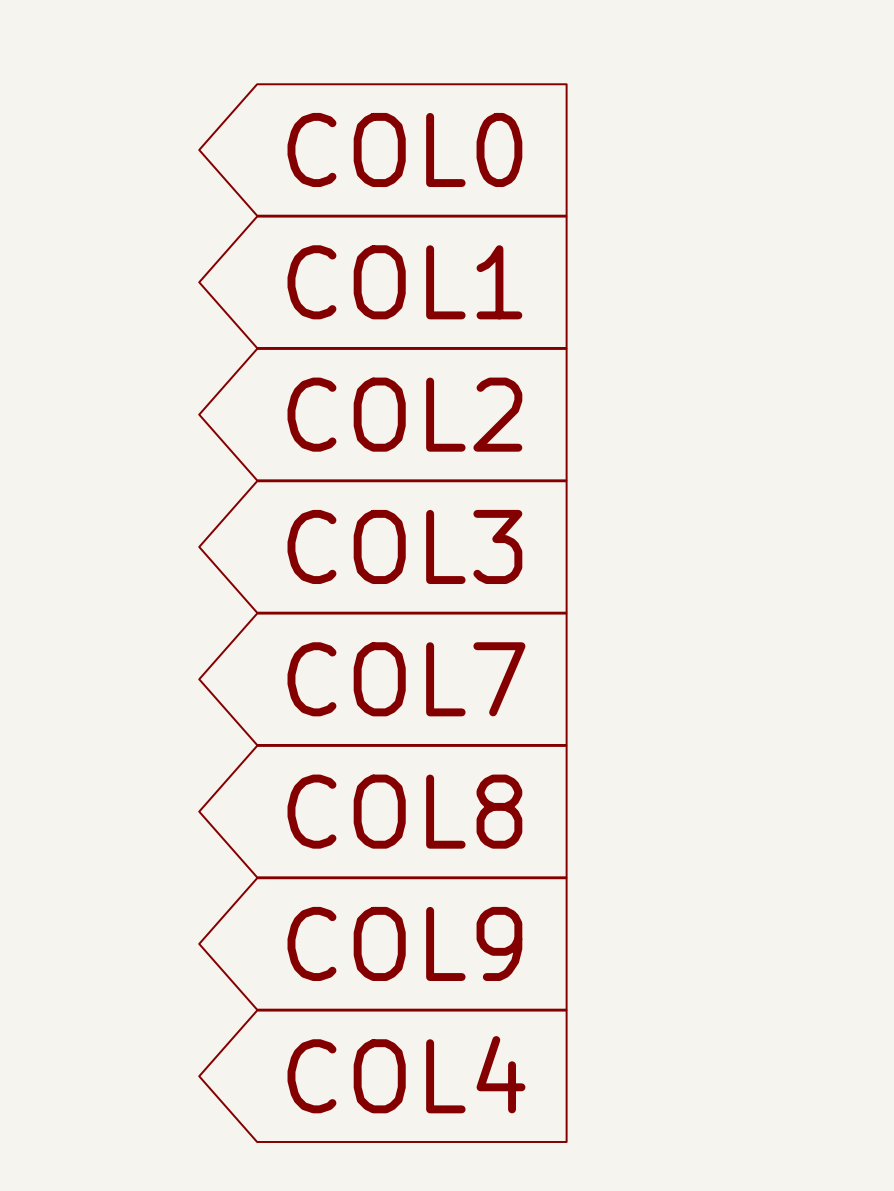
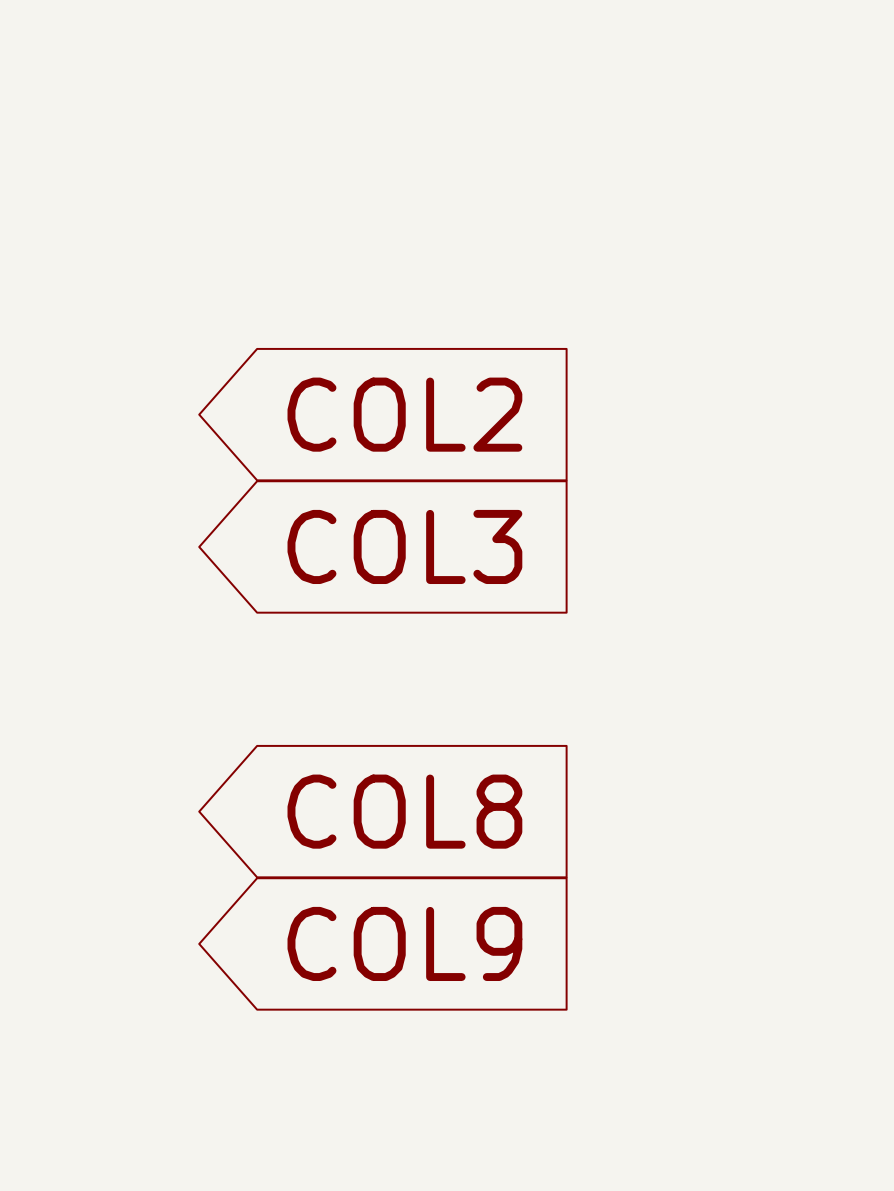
global label: COL0 (404, 149) -> none
global label: COL1 (404, 282) -> none
global label: COL7 (406, 679) -> none
global label: COL4 (406, 1074) -> none

